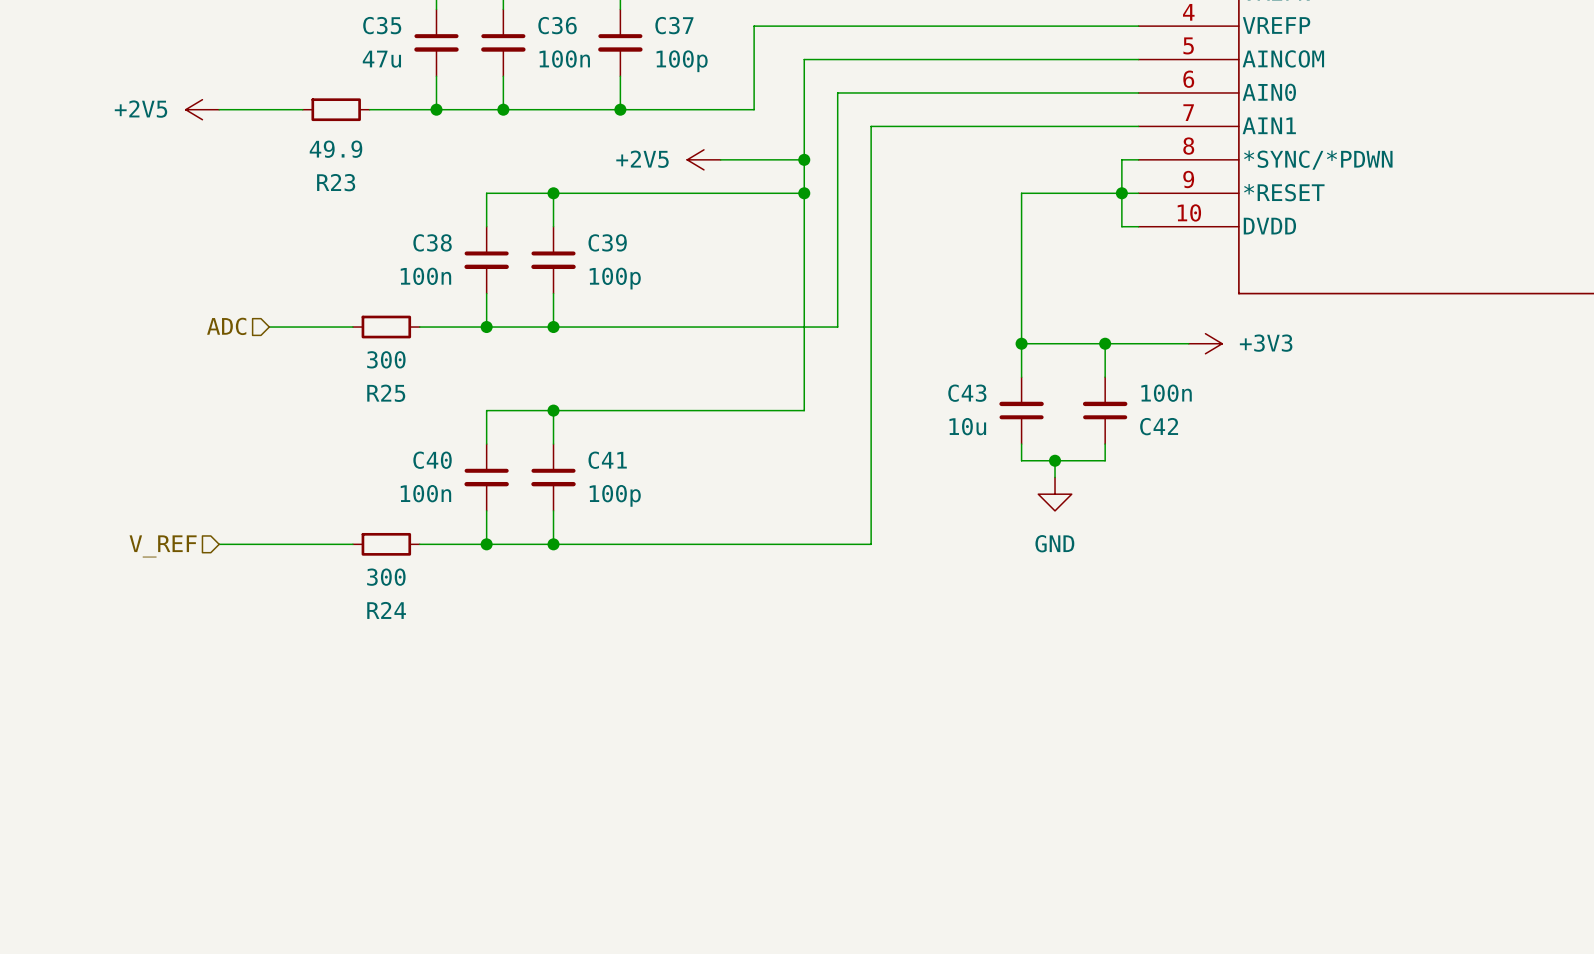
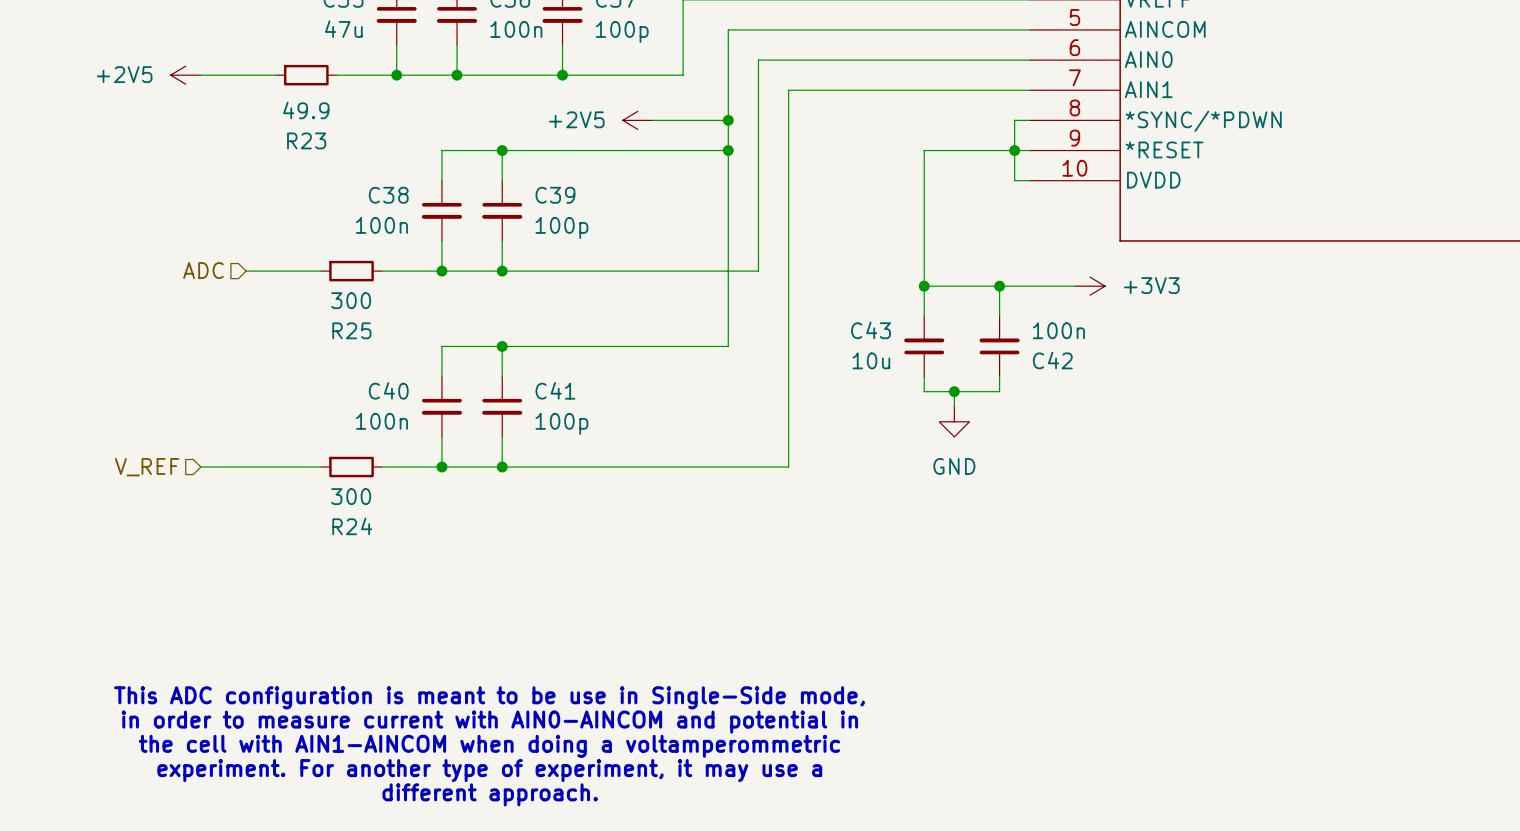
text: none -> This ADC configuration is meant to be use in Single-Side mode, (489, 697)
text: none -> in order to measure current with AIN0-AINCOM and potential in (489, 722)
text: none -> the cell with AIN1-AINCOM when doing a voltamperommetric (489, 746)
text: none -> experiment. For another type of experiment, it may use a (489, 770)
text: none -> different approach. (490, 794)

